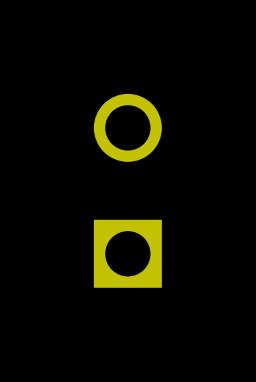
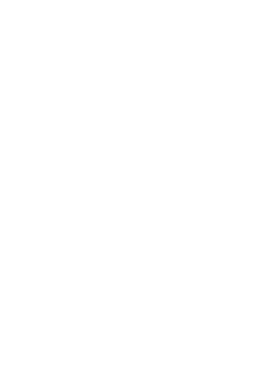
part: (127, 190) -> none

